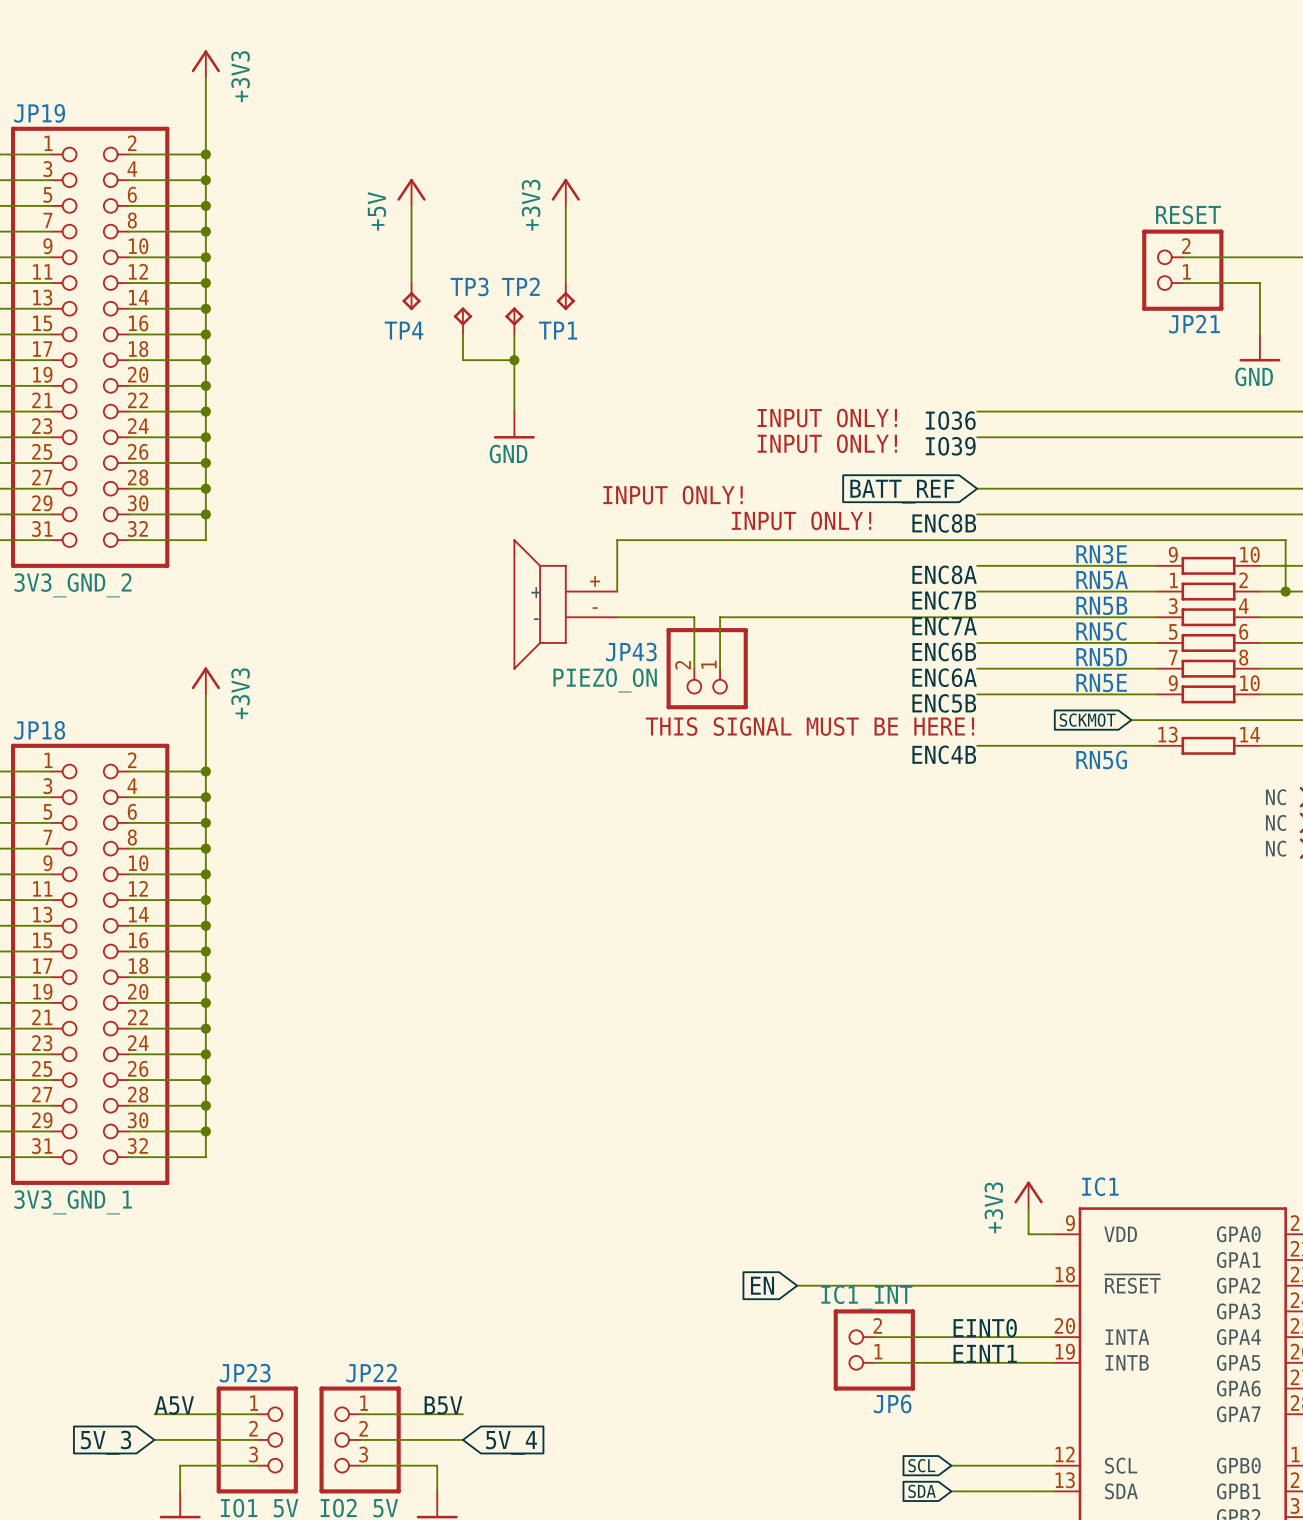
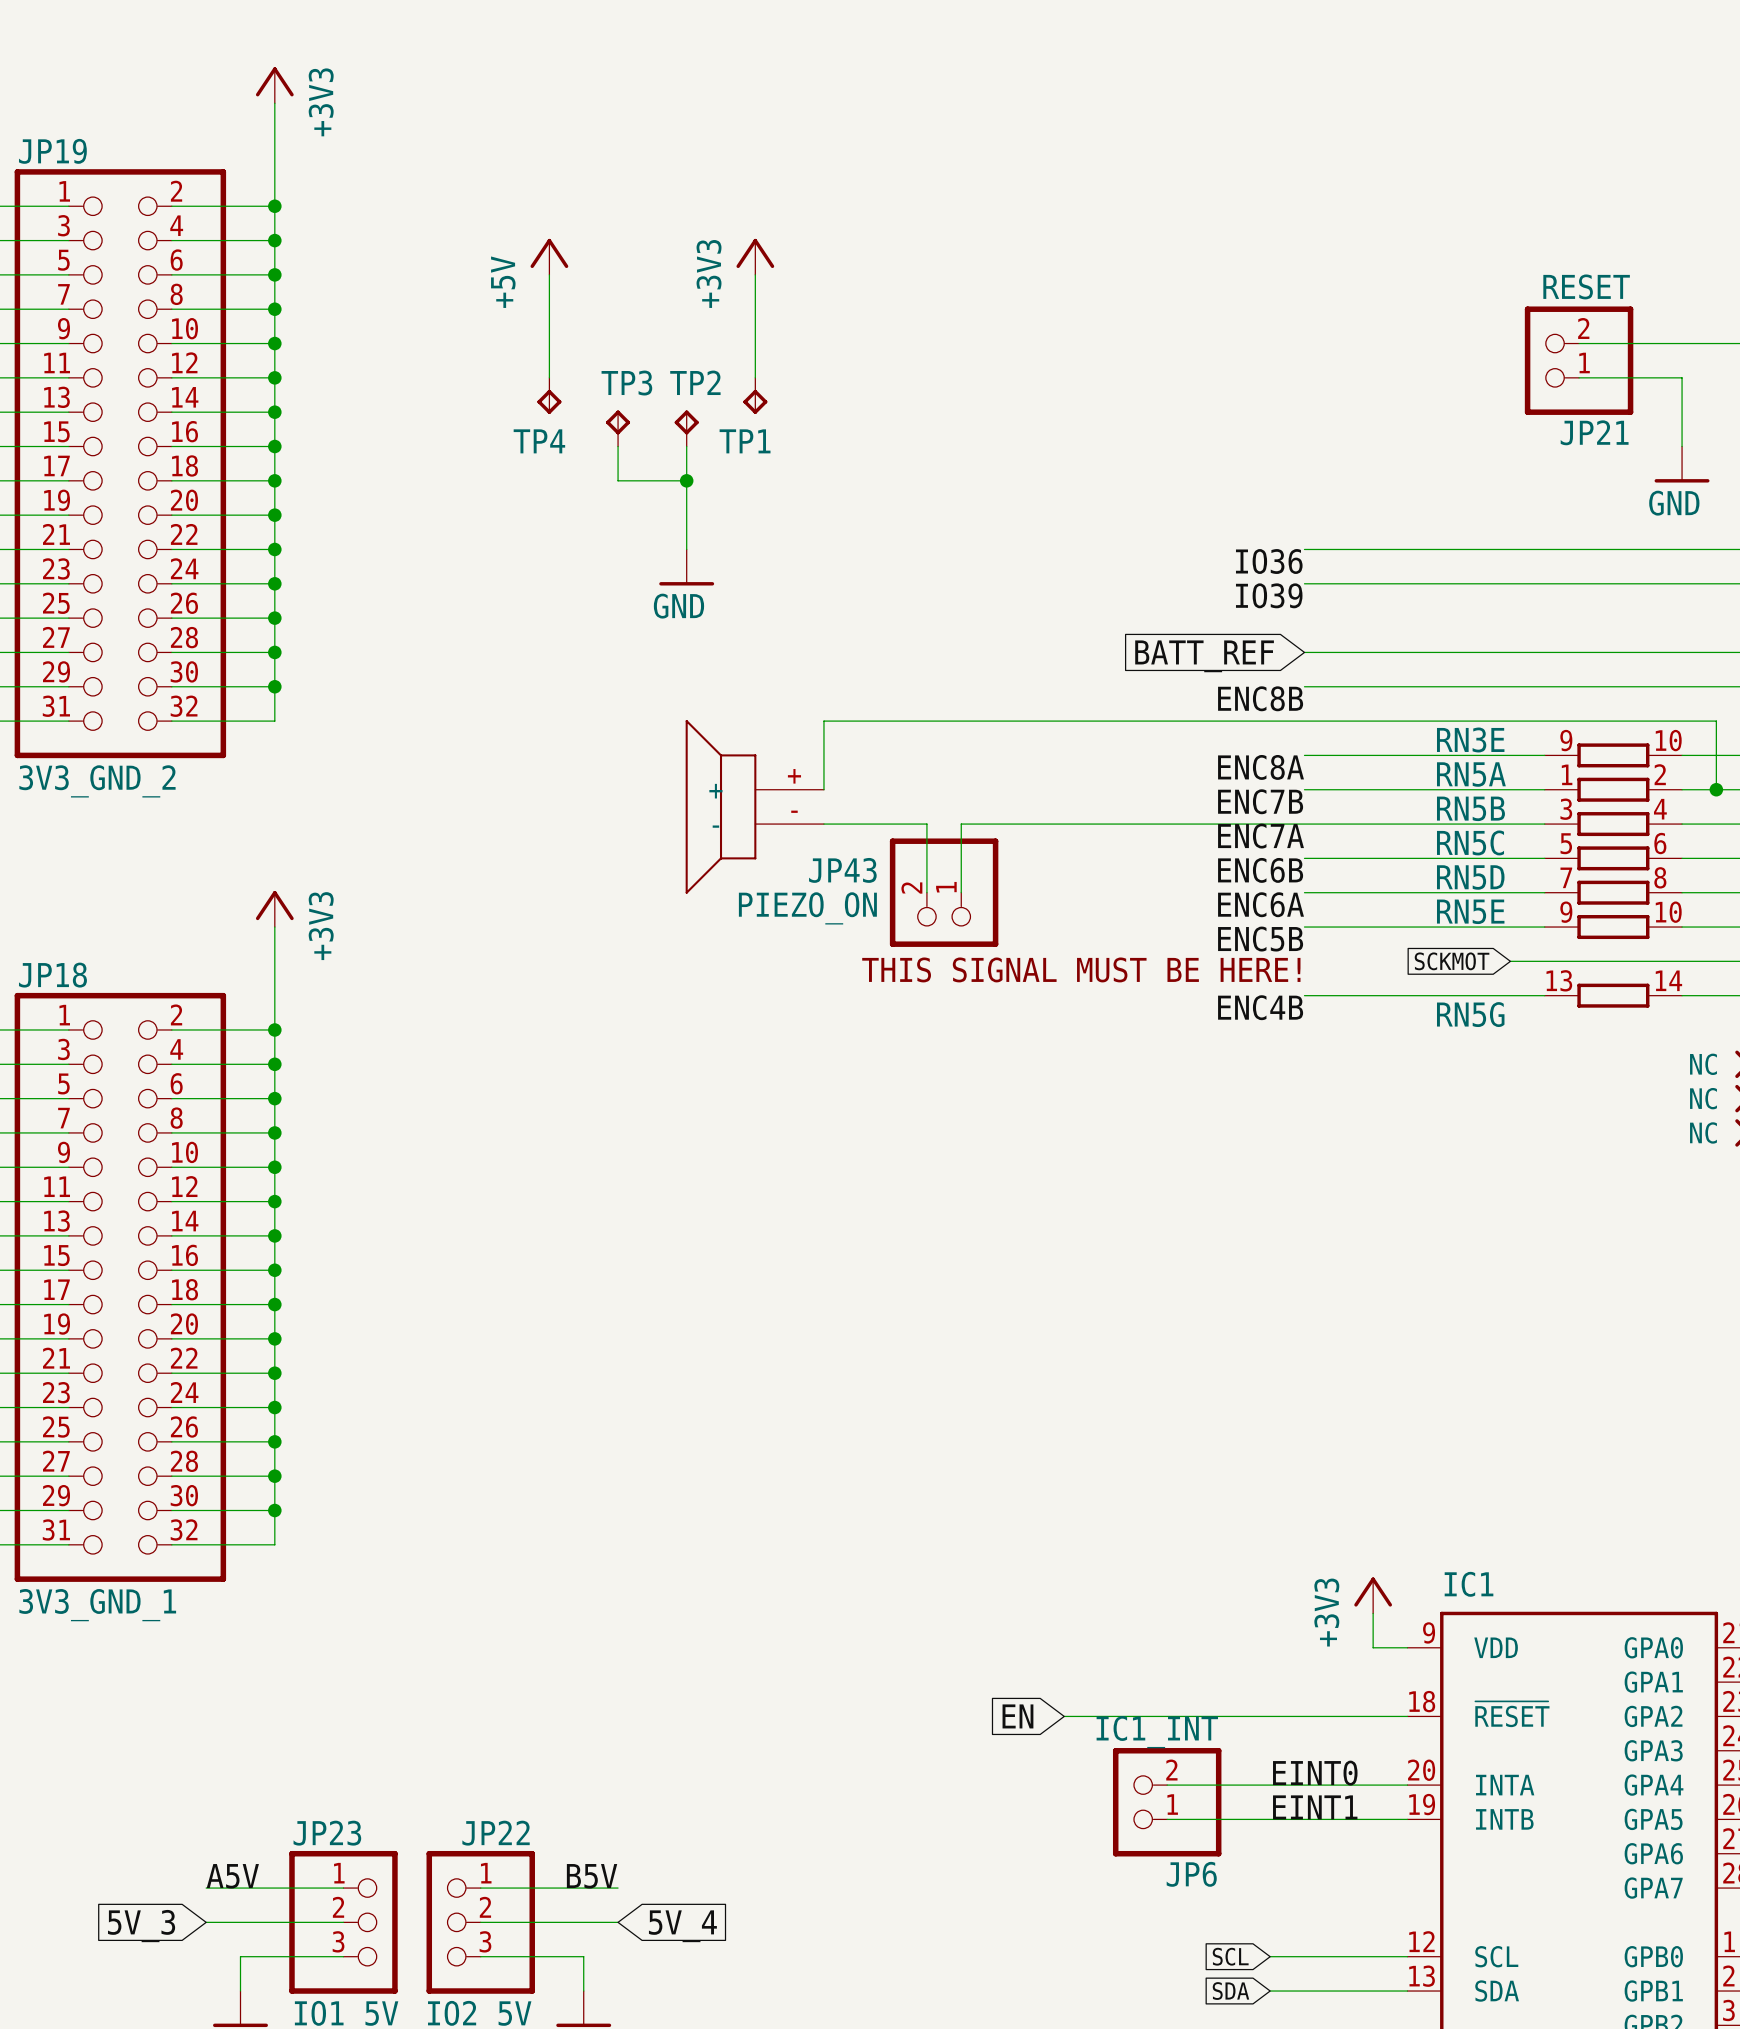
text: INPUT ONLY! (827, 418) -> none
text: INPUT ONLY! (827, 443) -> none
text: INPUT ONLY! (673, 495) -> none
text: INPUT ONLY! (801, 520) -> none

